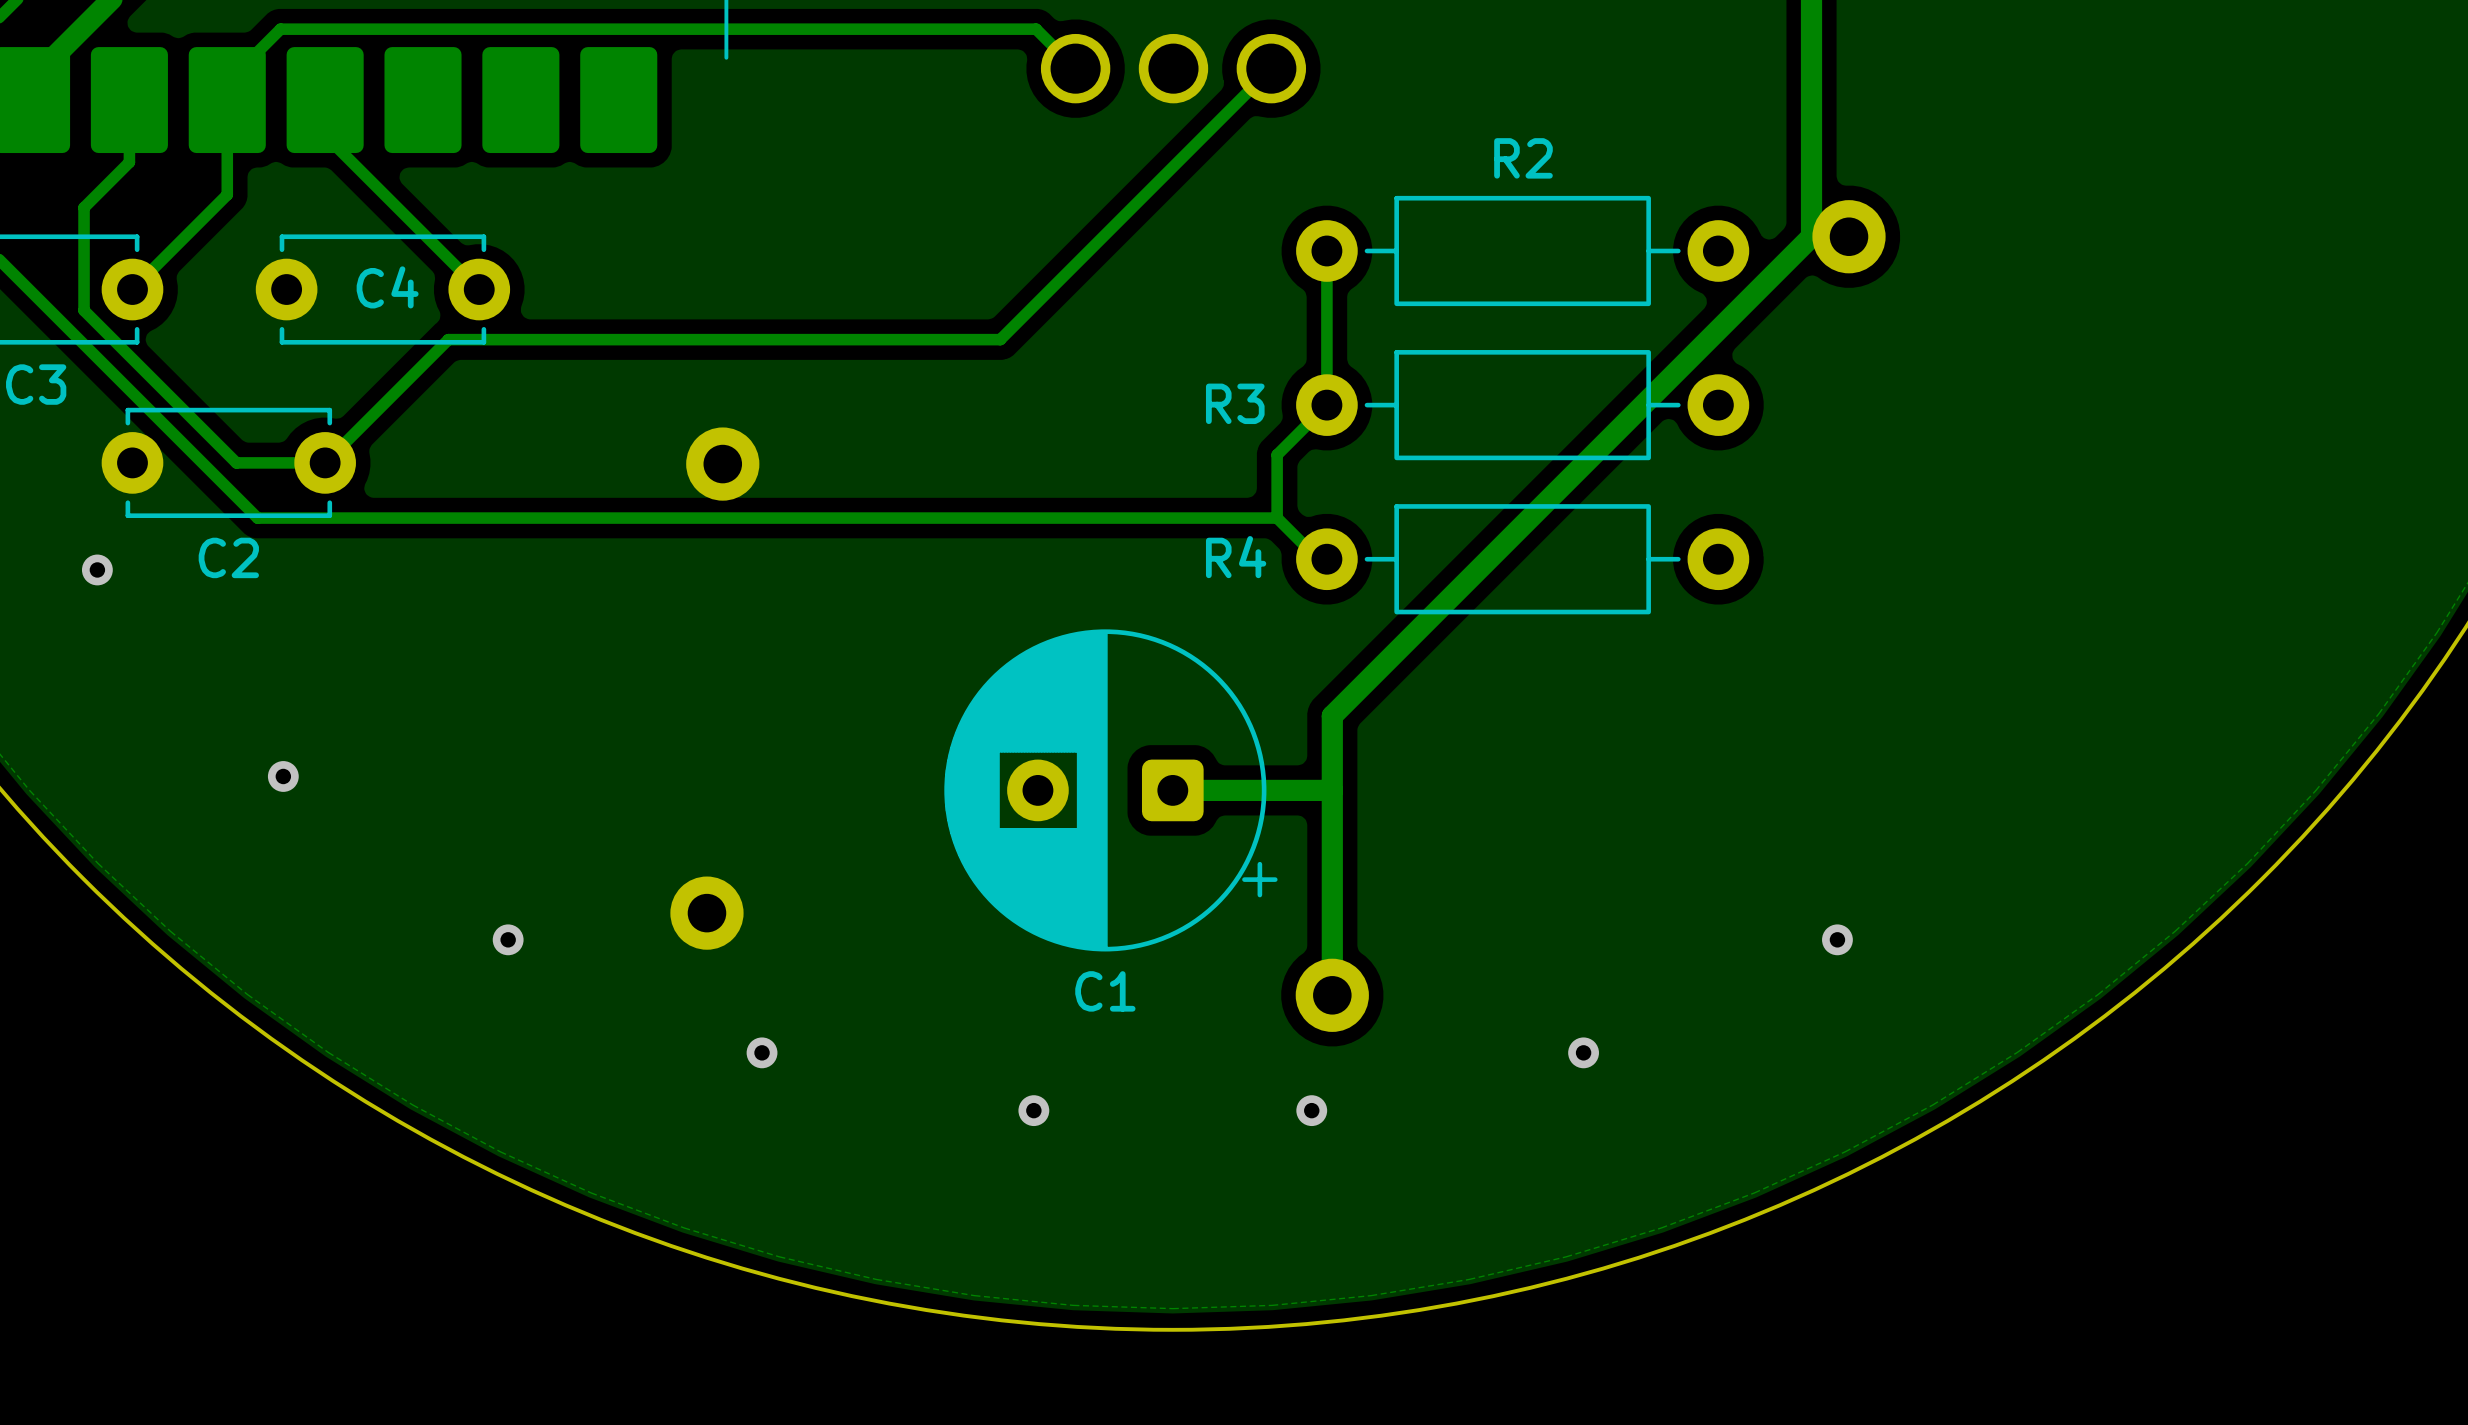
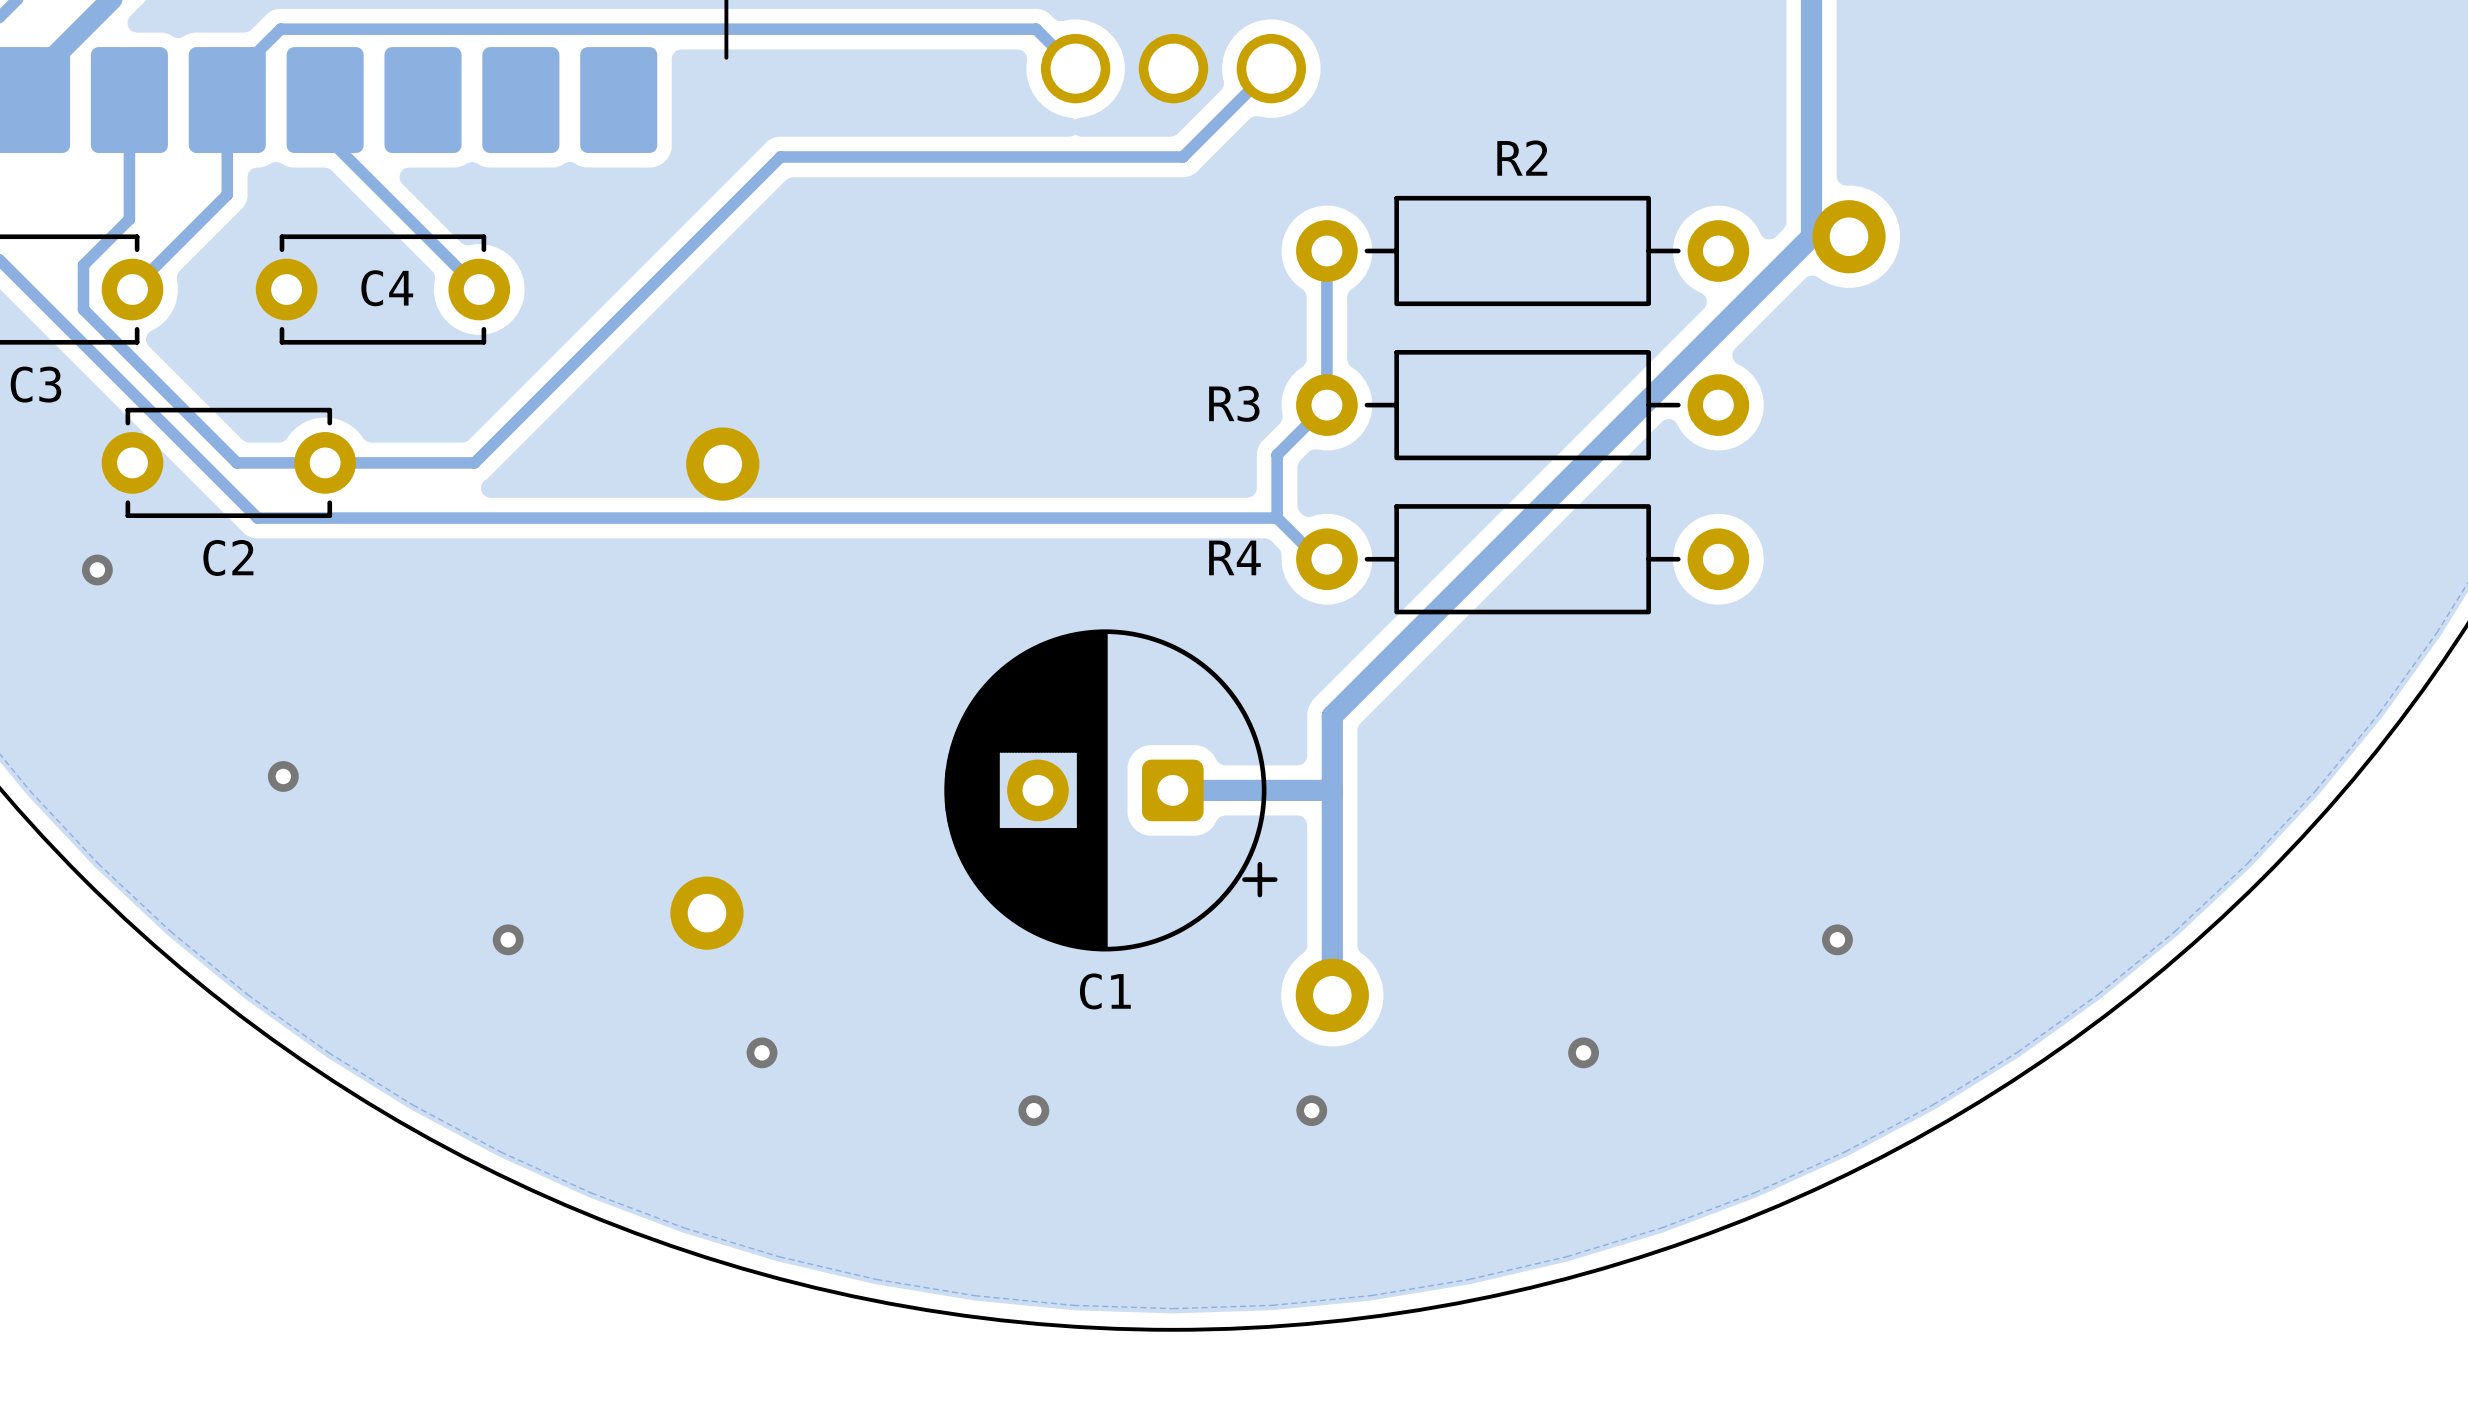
track: (1183, 156) (1000, 339) (448, 339) (325, 462) -> (1183, 156) (780, 156) (474, 462) (325, 462)
track: (129, 162) (84, 207) (84, 310) (236, 462) -> (129, 162) (129, 219) (83, 265) (83, 309) (236, 462)

